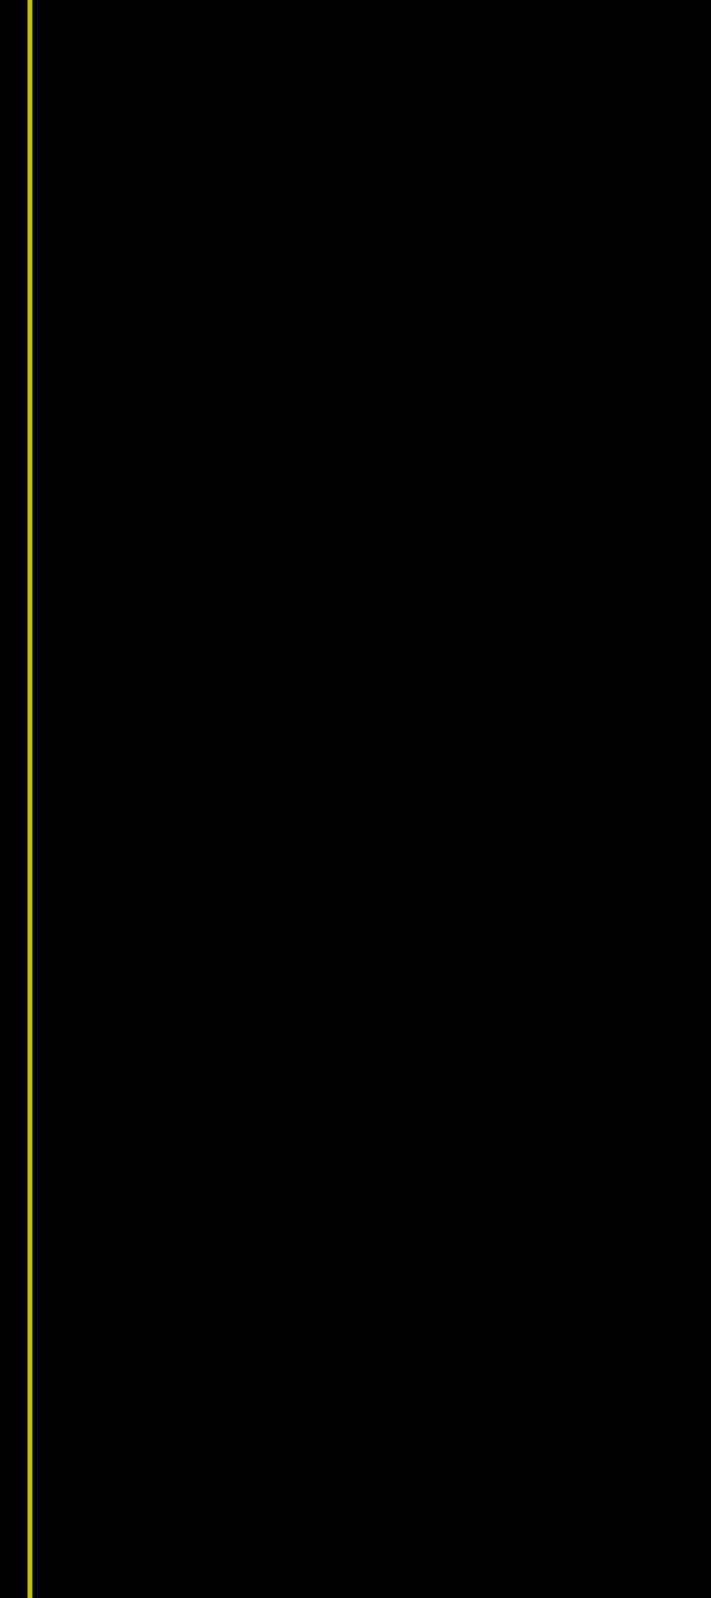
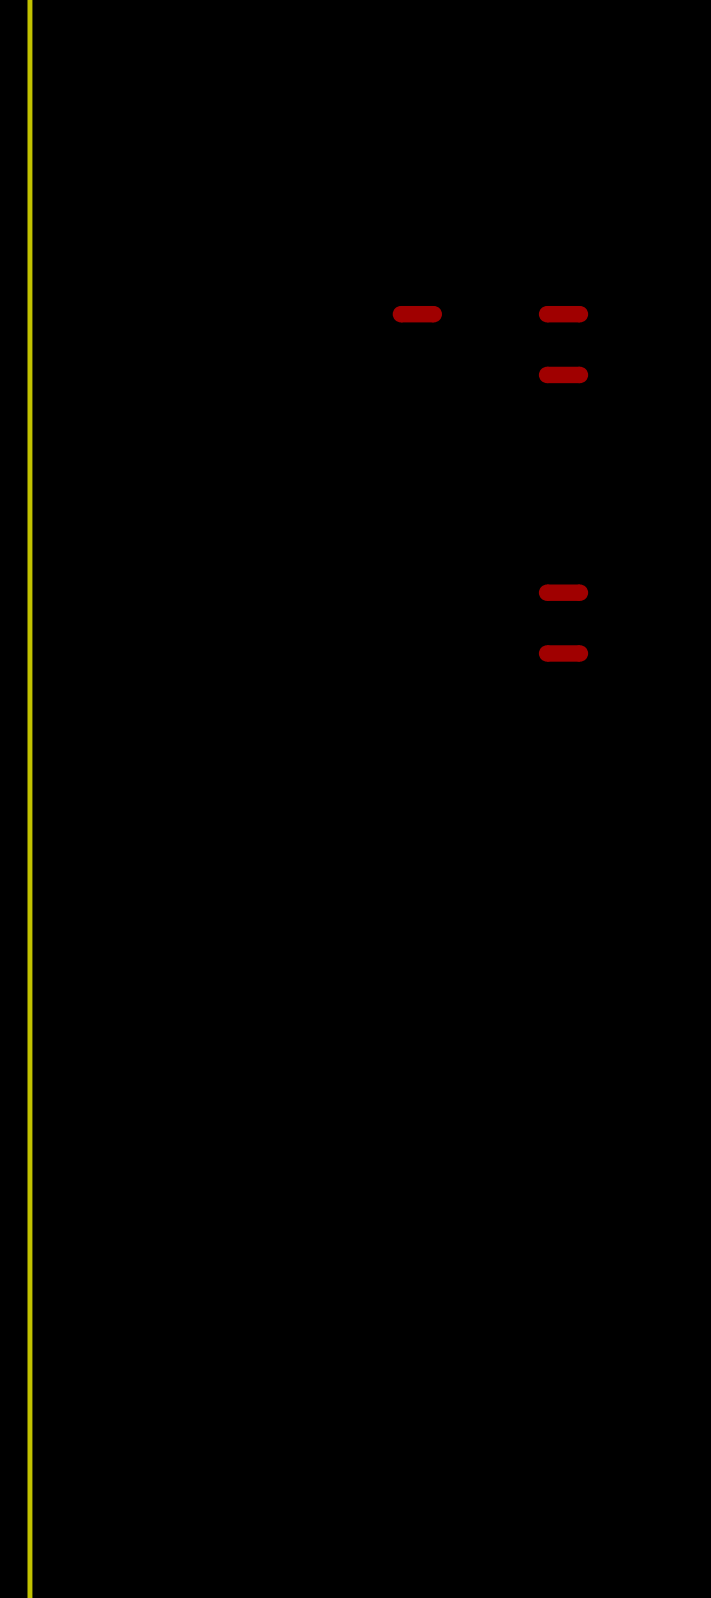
part: none -> (417, 314)
part: none -> (563, 314)
part: none -> (563, 374)
part: none -> (563, 592)
part: none -> (563, 653)

